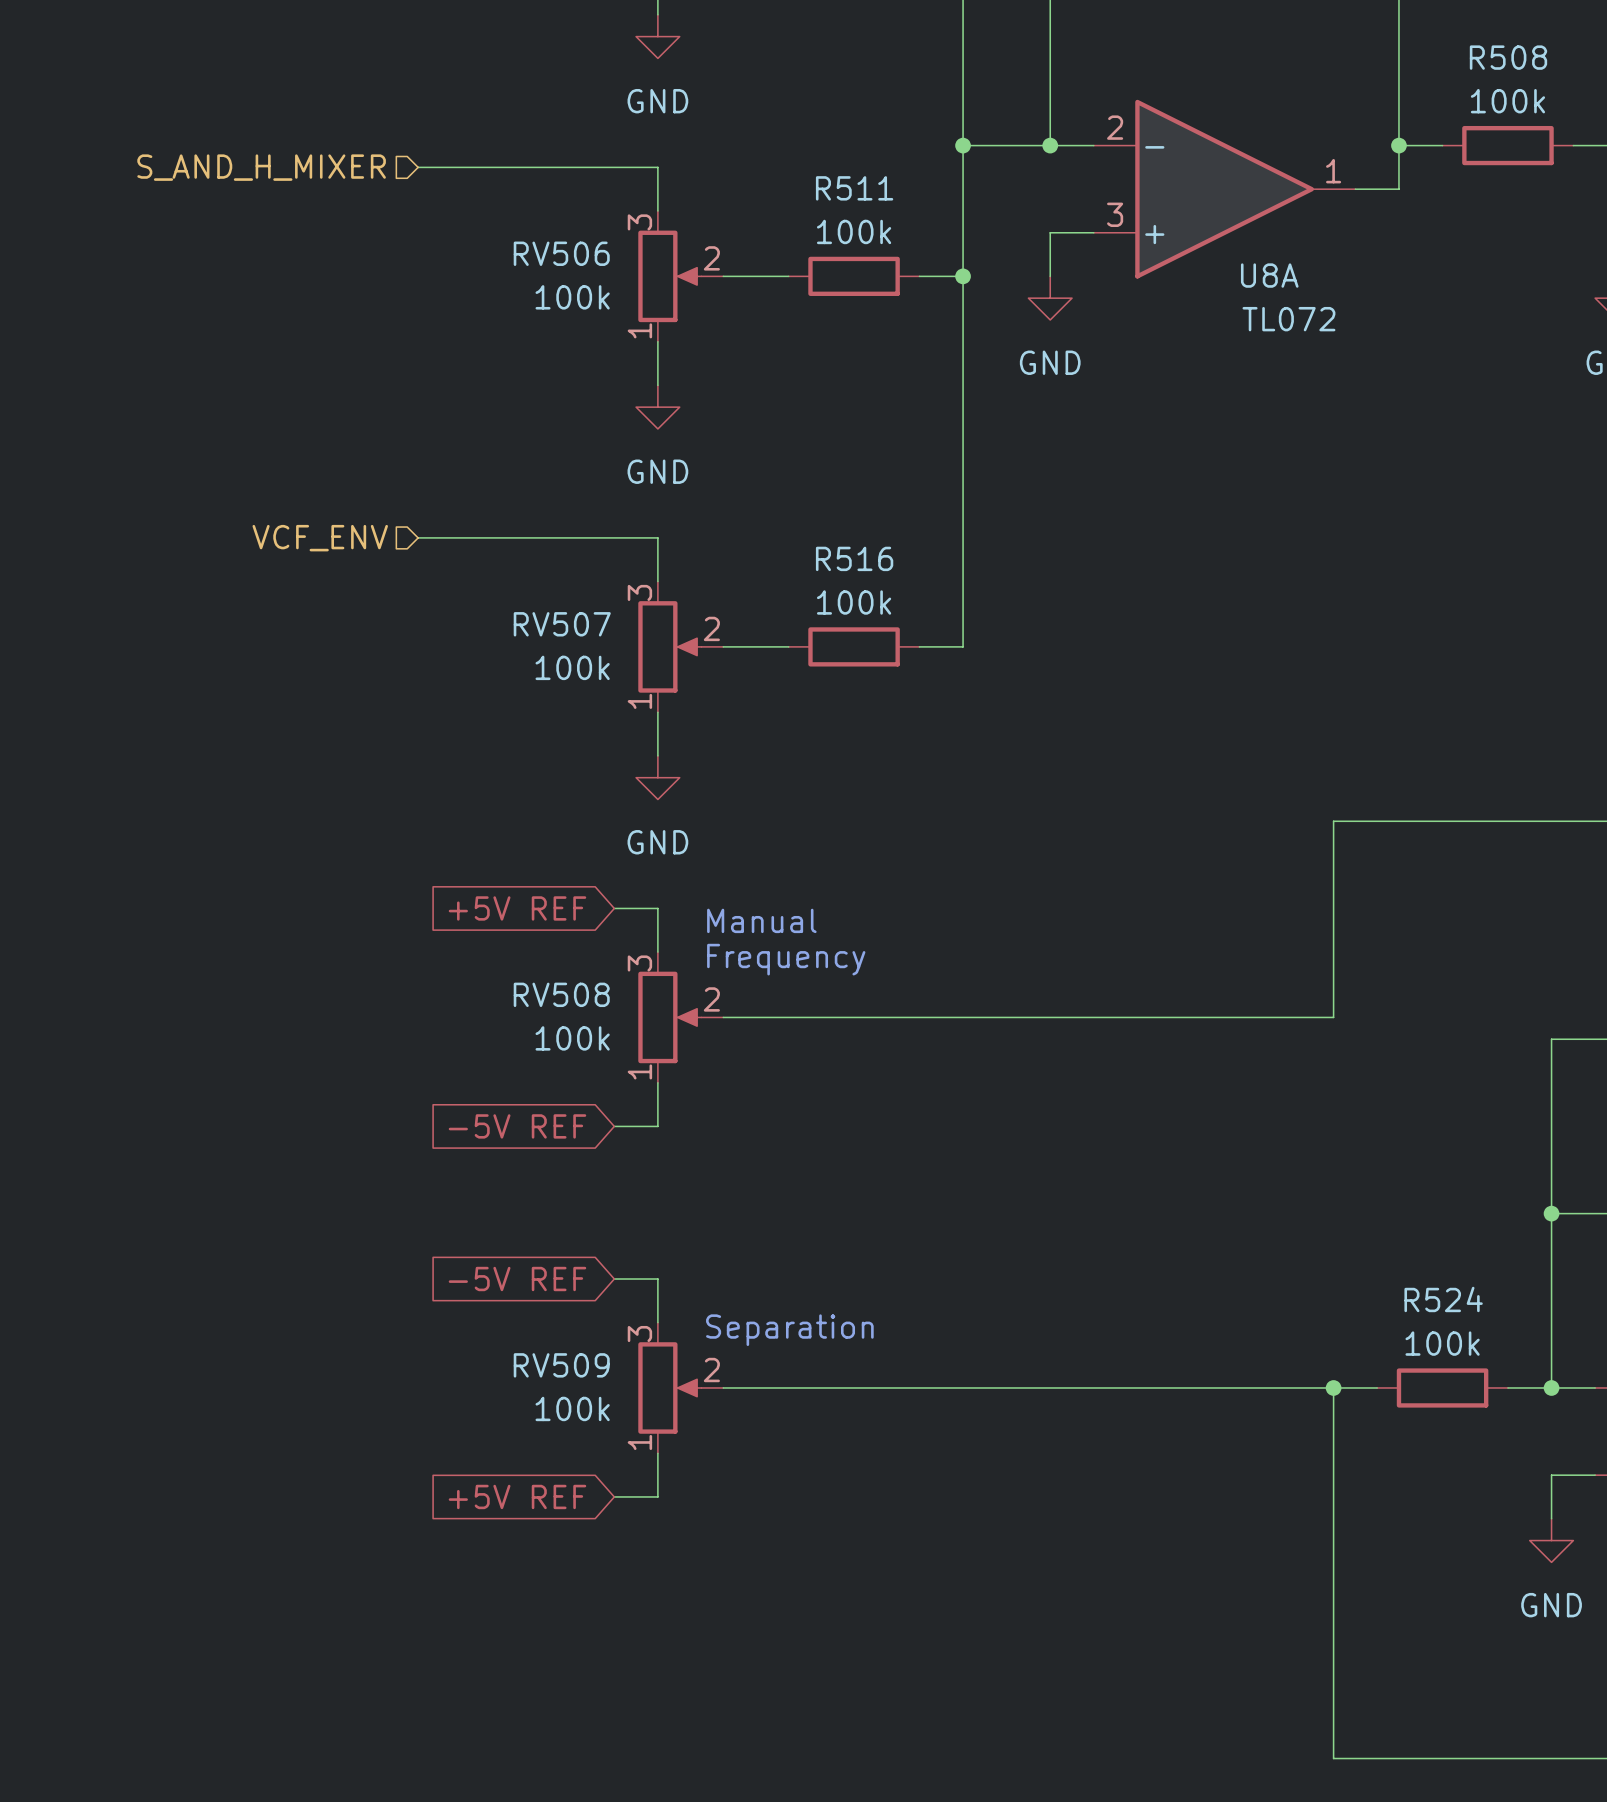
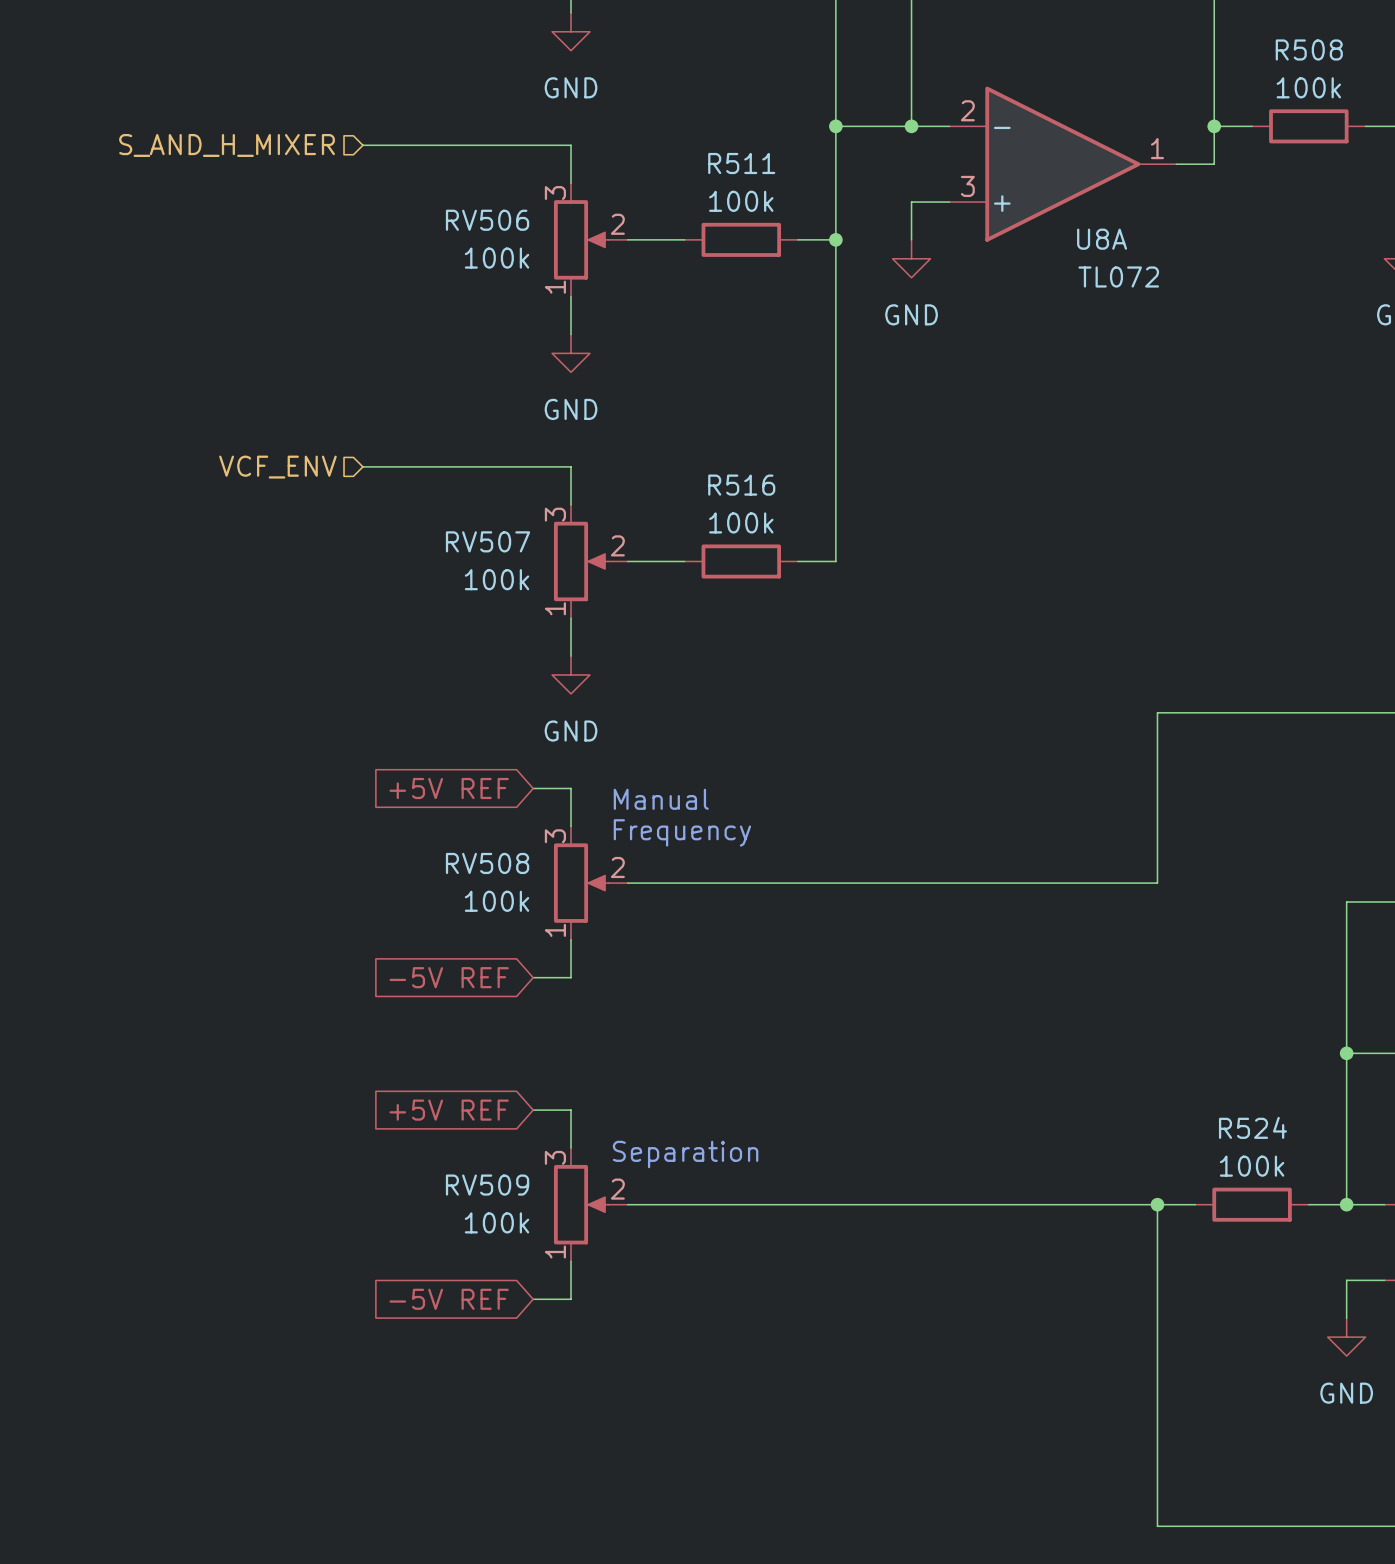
global label: -5V REF (517, 1279) -> +5V REF (449, 1110)
global label: +5V REF (517, 1496) -> -5V REF (449, 1299)

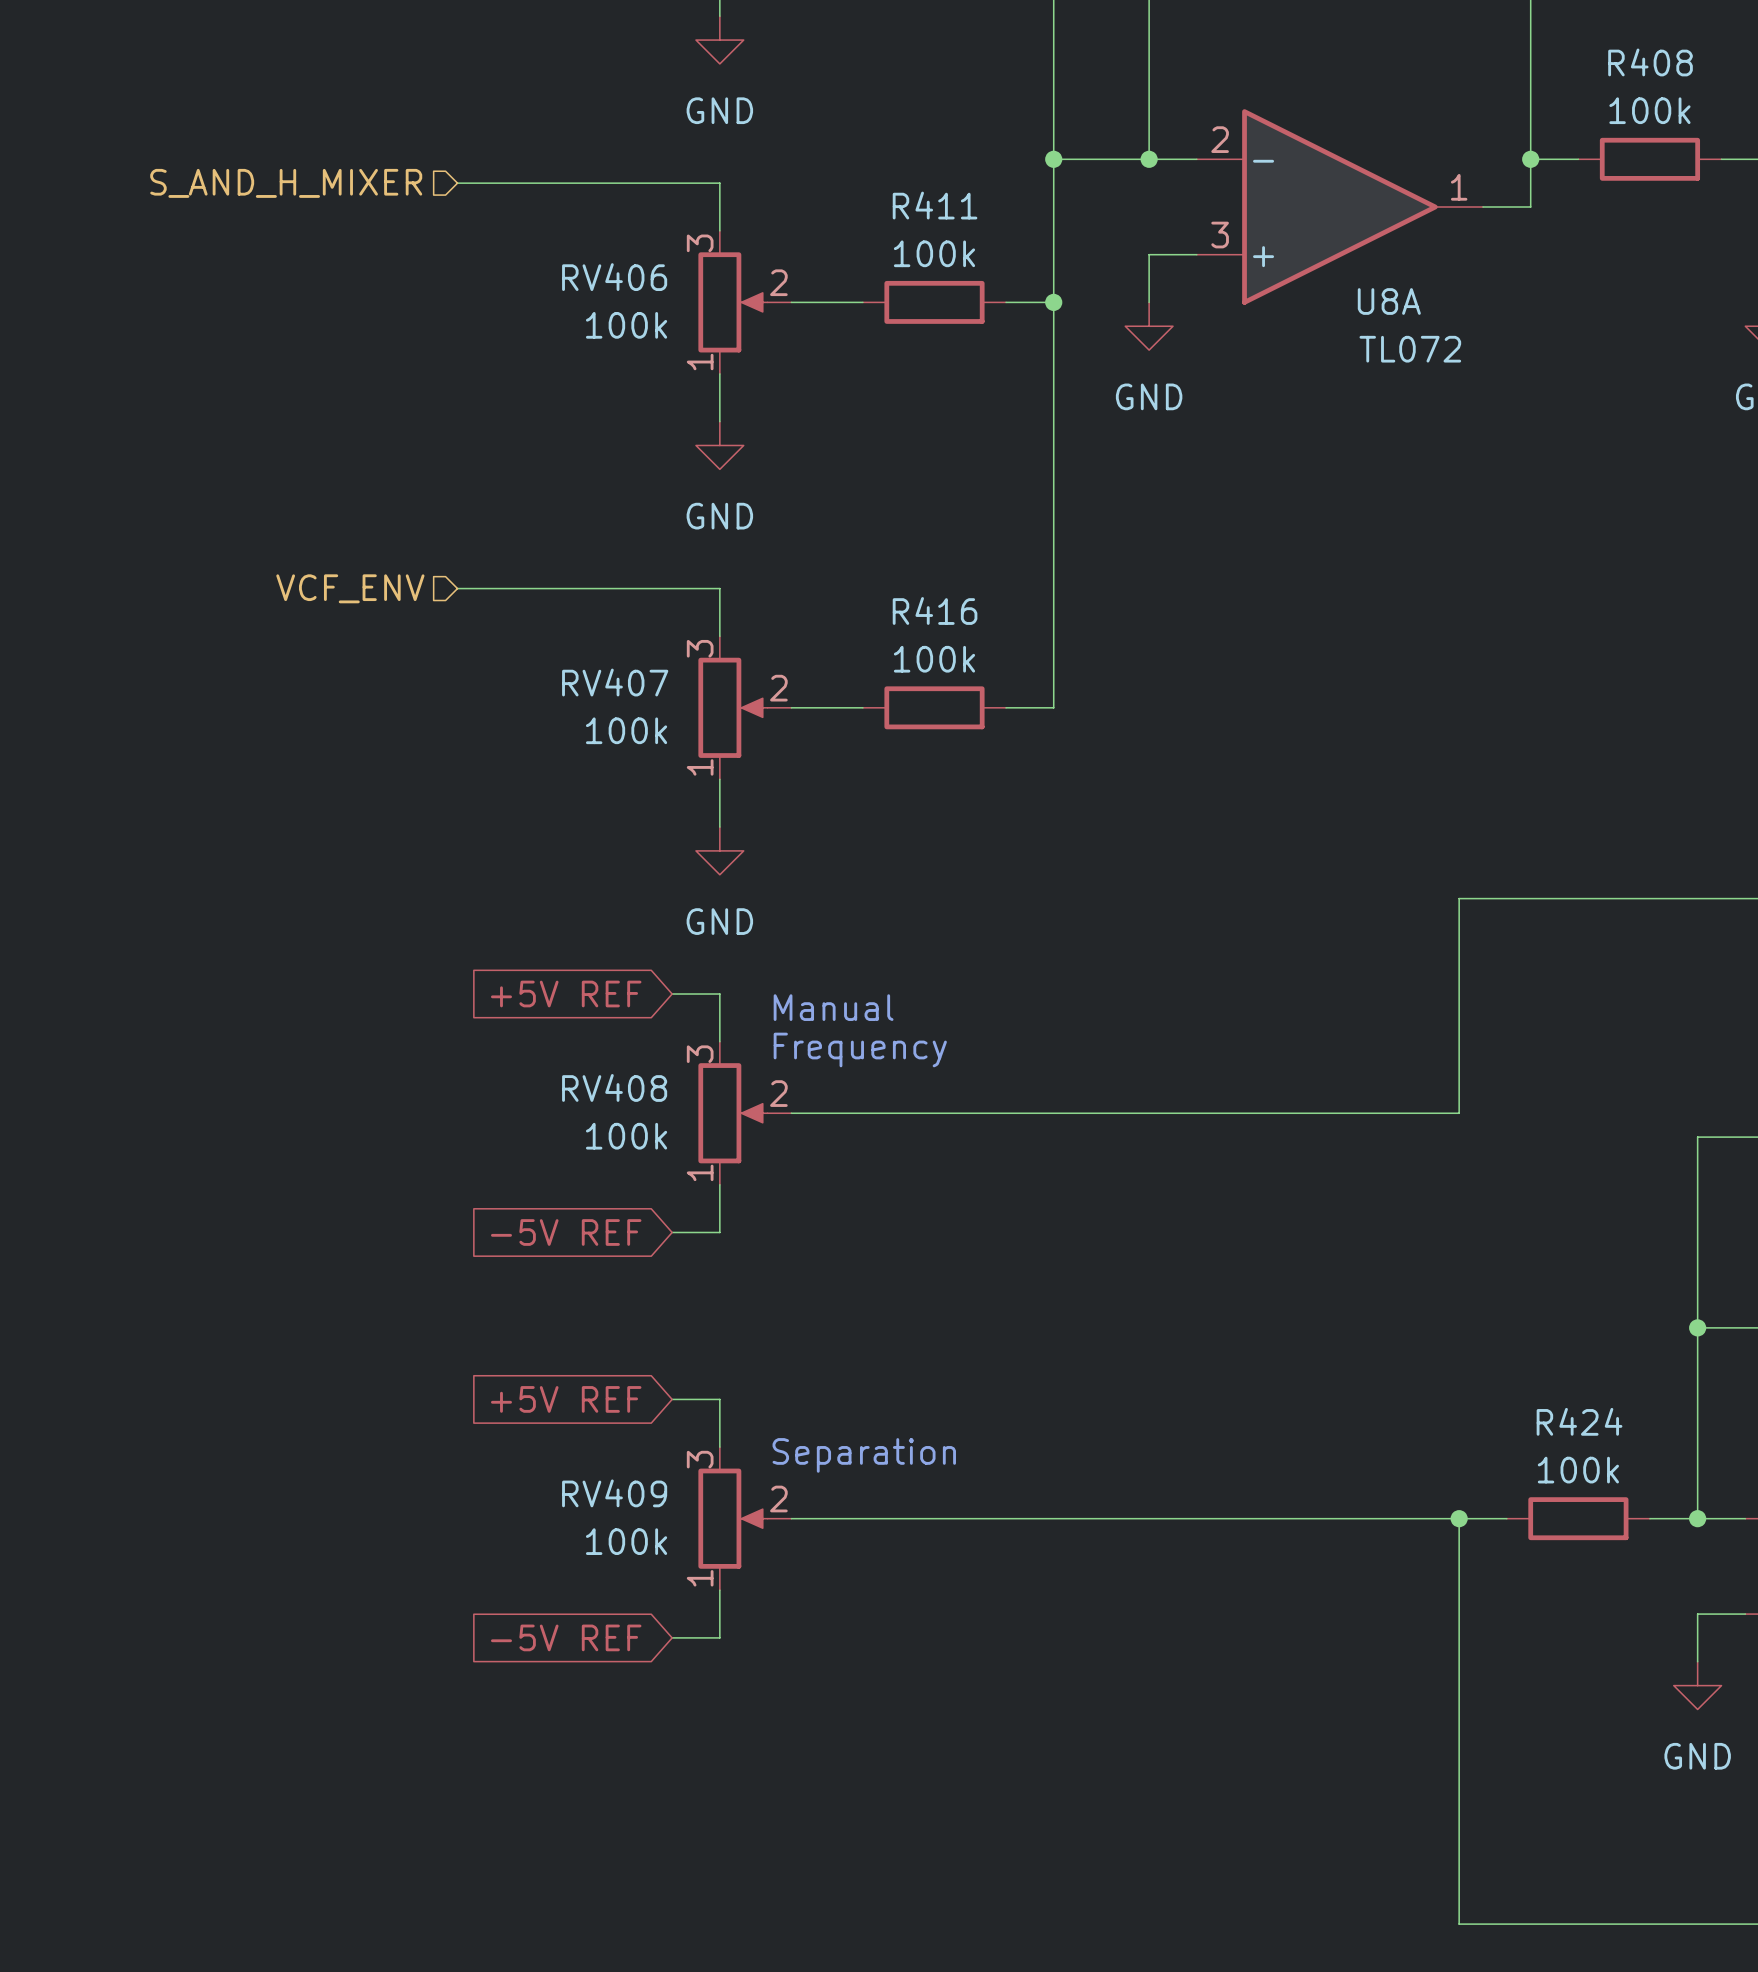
R508 name: R508 (1309, 49) -> R408 (1650, 62)
R511 name: R511 (741, 163) -> R411 (935, 205)
RV506 name: RV506 (487, 220) -> RV406 (614, 277)
R516 name: R516 (741, 485) -> R416 (935, 610)
RV507 name: RV507 (487, 541) -> RV407 (615, 682)
RV508 name: RV508 (487, 863) -> RV408 (614, 1087)
R524 name: R524 (1252, 1127) -> R424 (1579, 1421)
RV509 name: RV509 (487, 1185) -> RV409 (614, 1493)

